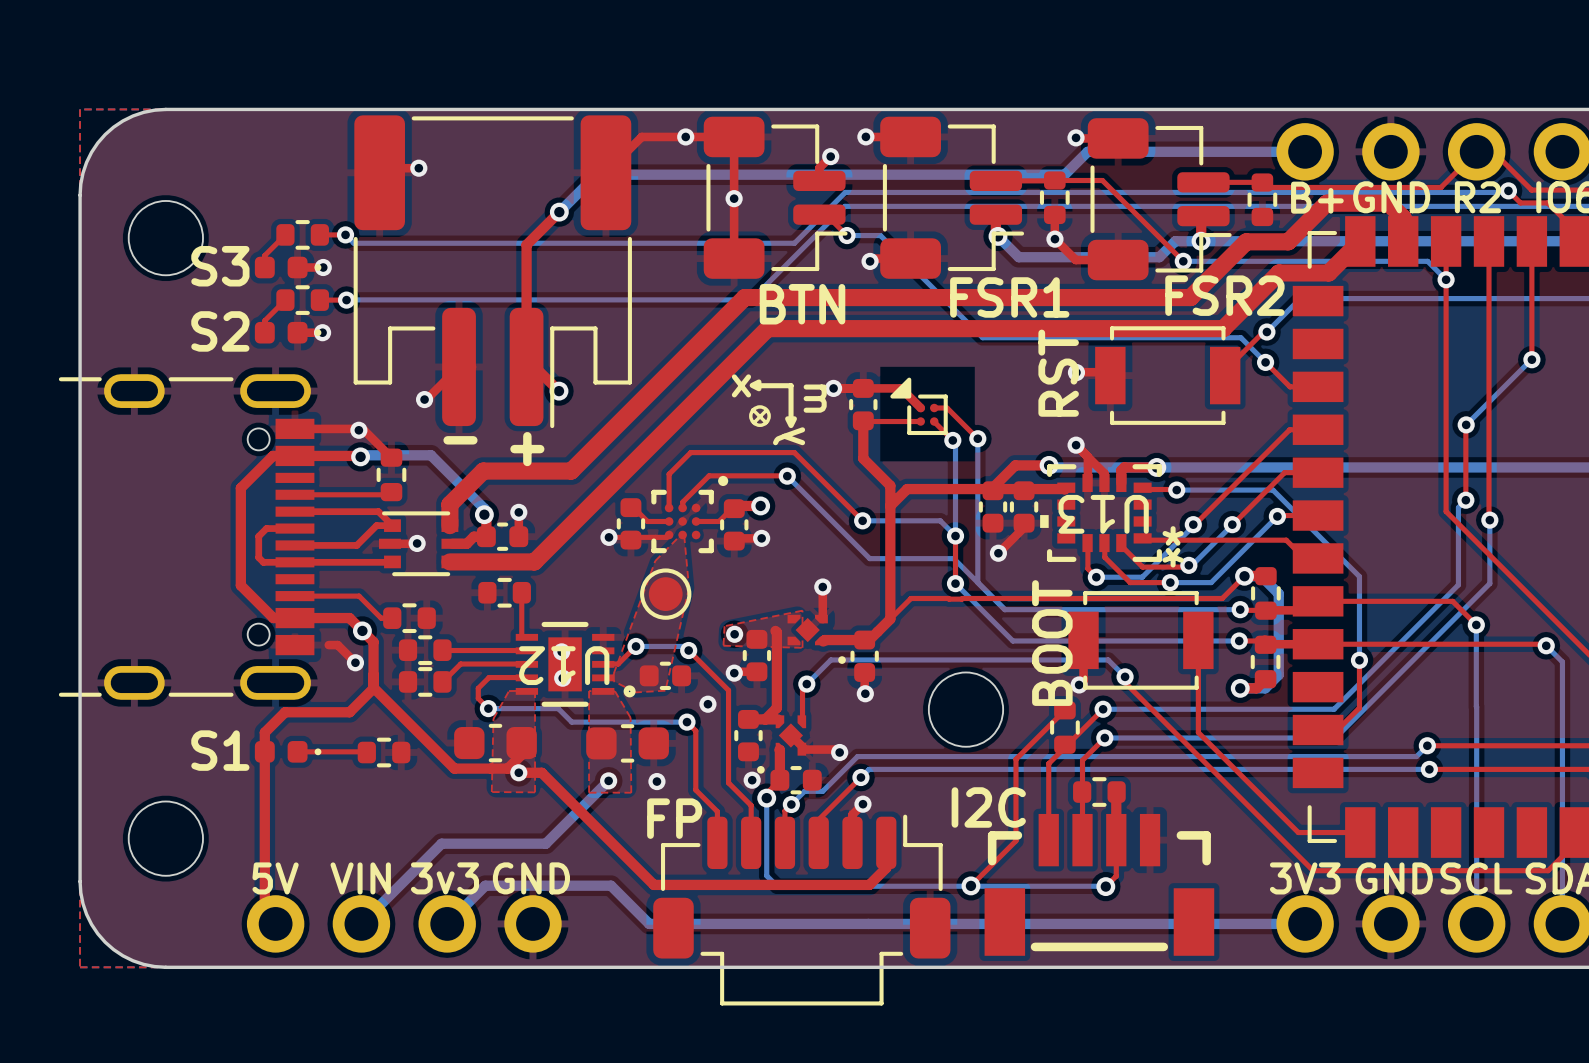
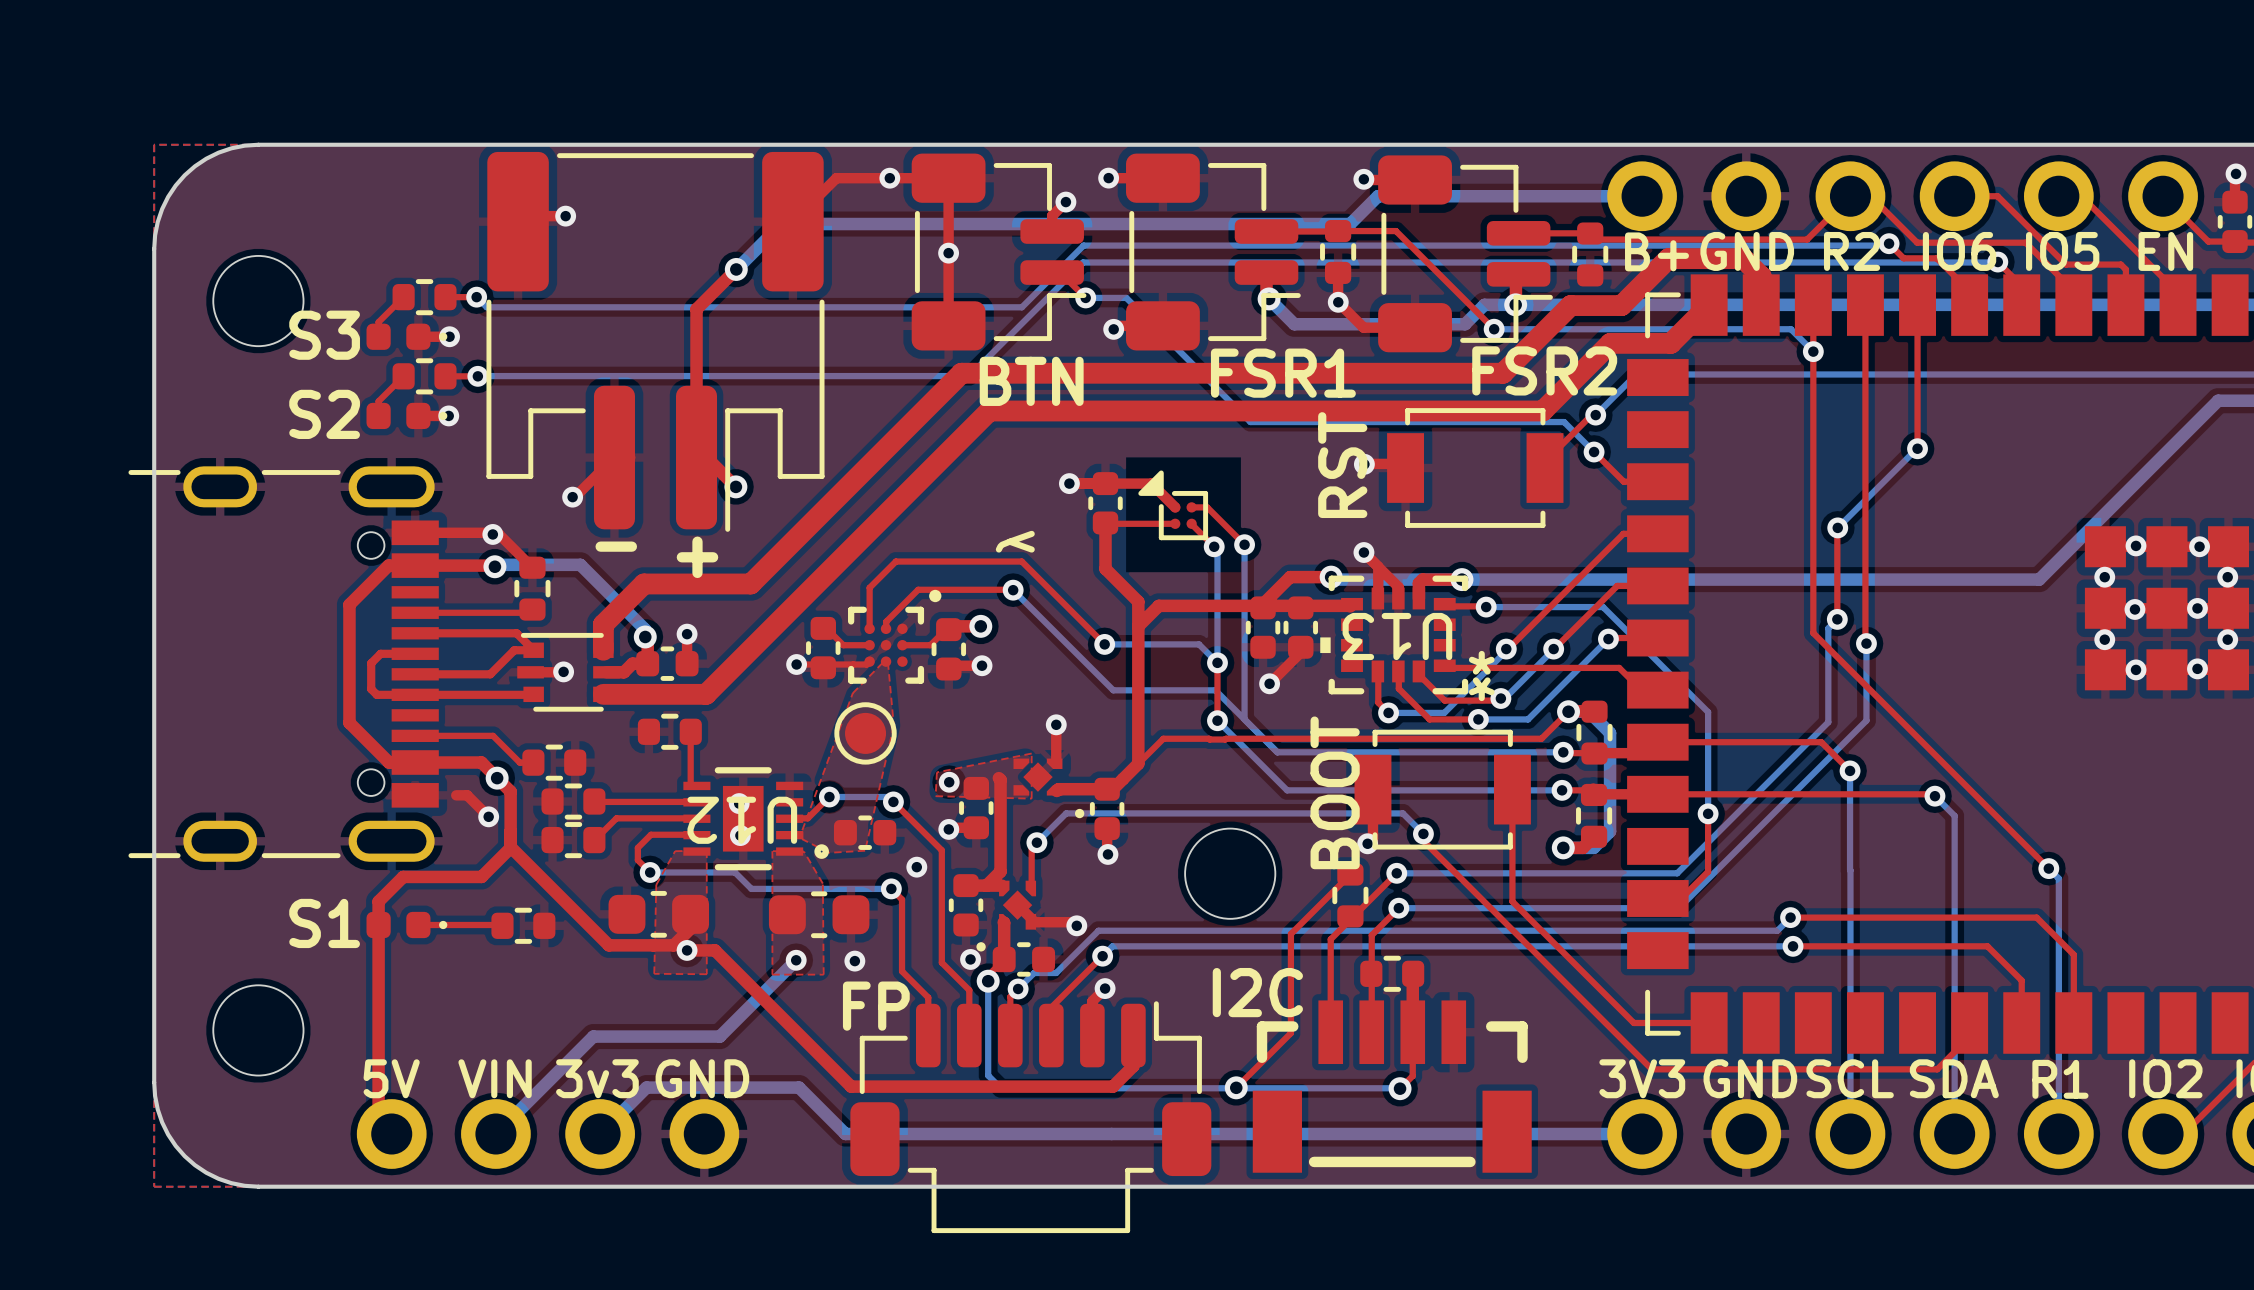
drawing: [749, 379, 797, 429] -> none
text: x (741, 385) -> none
line: (757, 385) (791, 385) (791, 419) -> none
text: m (815, 398) -> none
line: (752, 409) (766, 422) -> none
line: (766, 410) (754, 422) -> none

